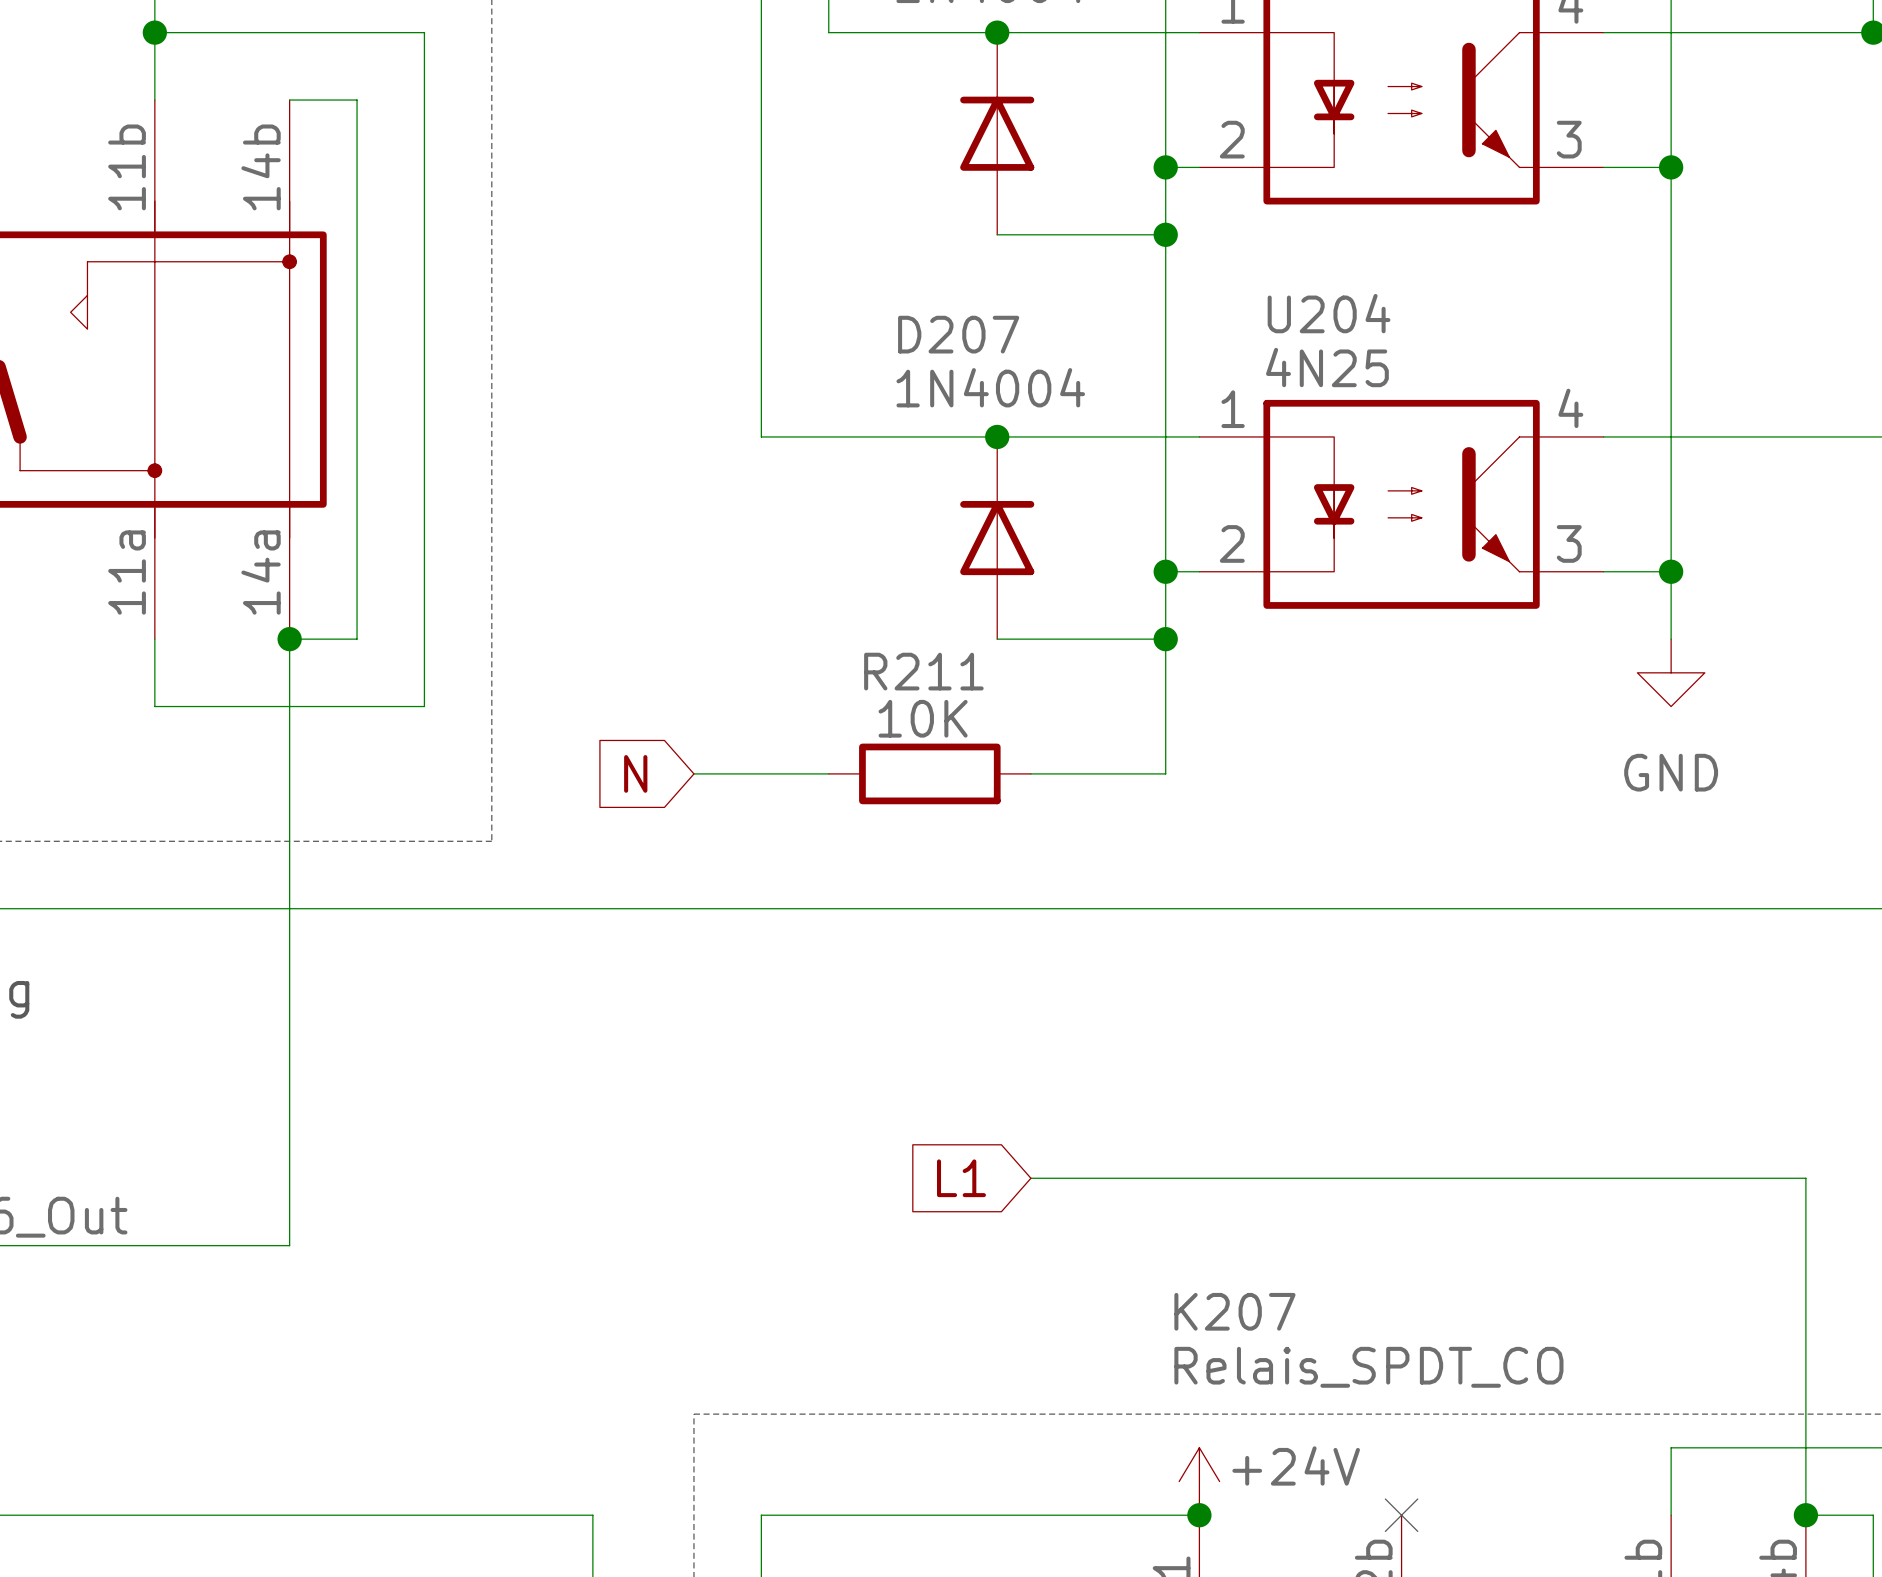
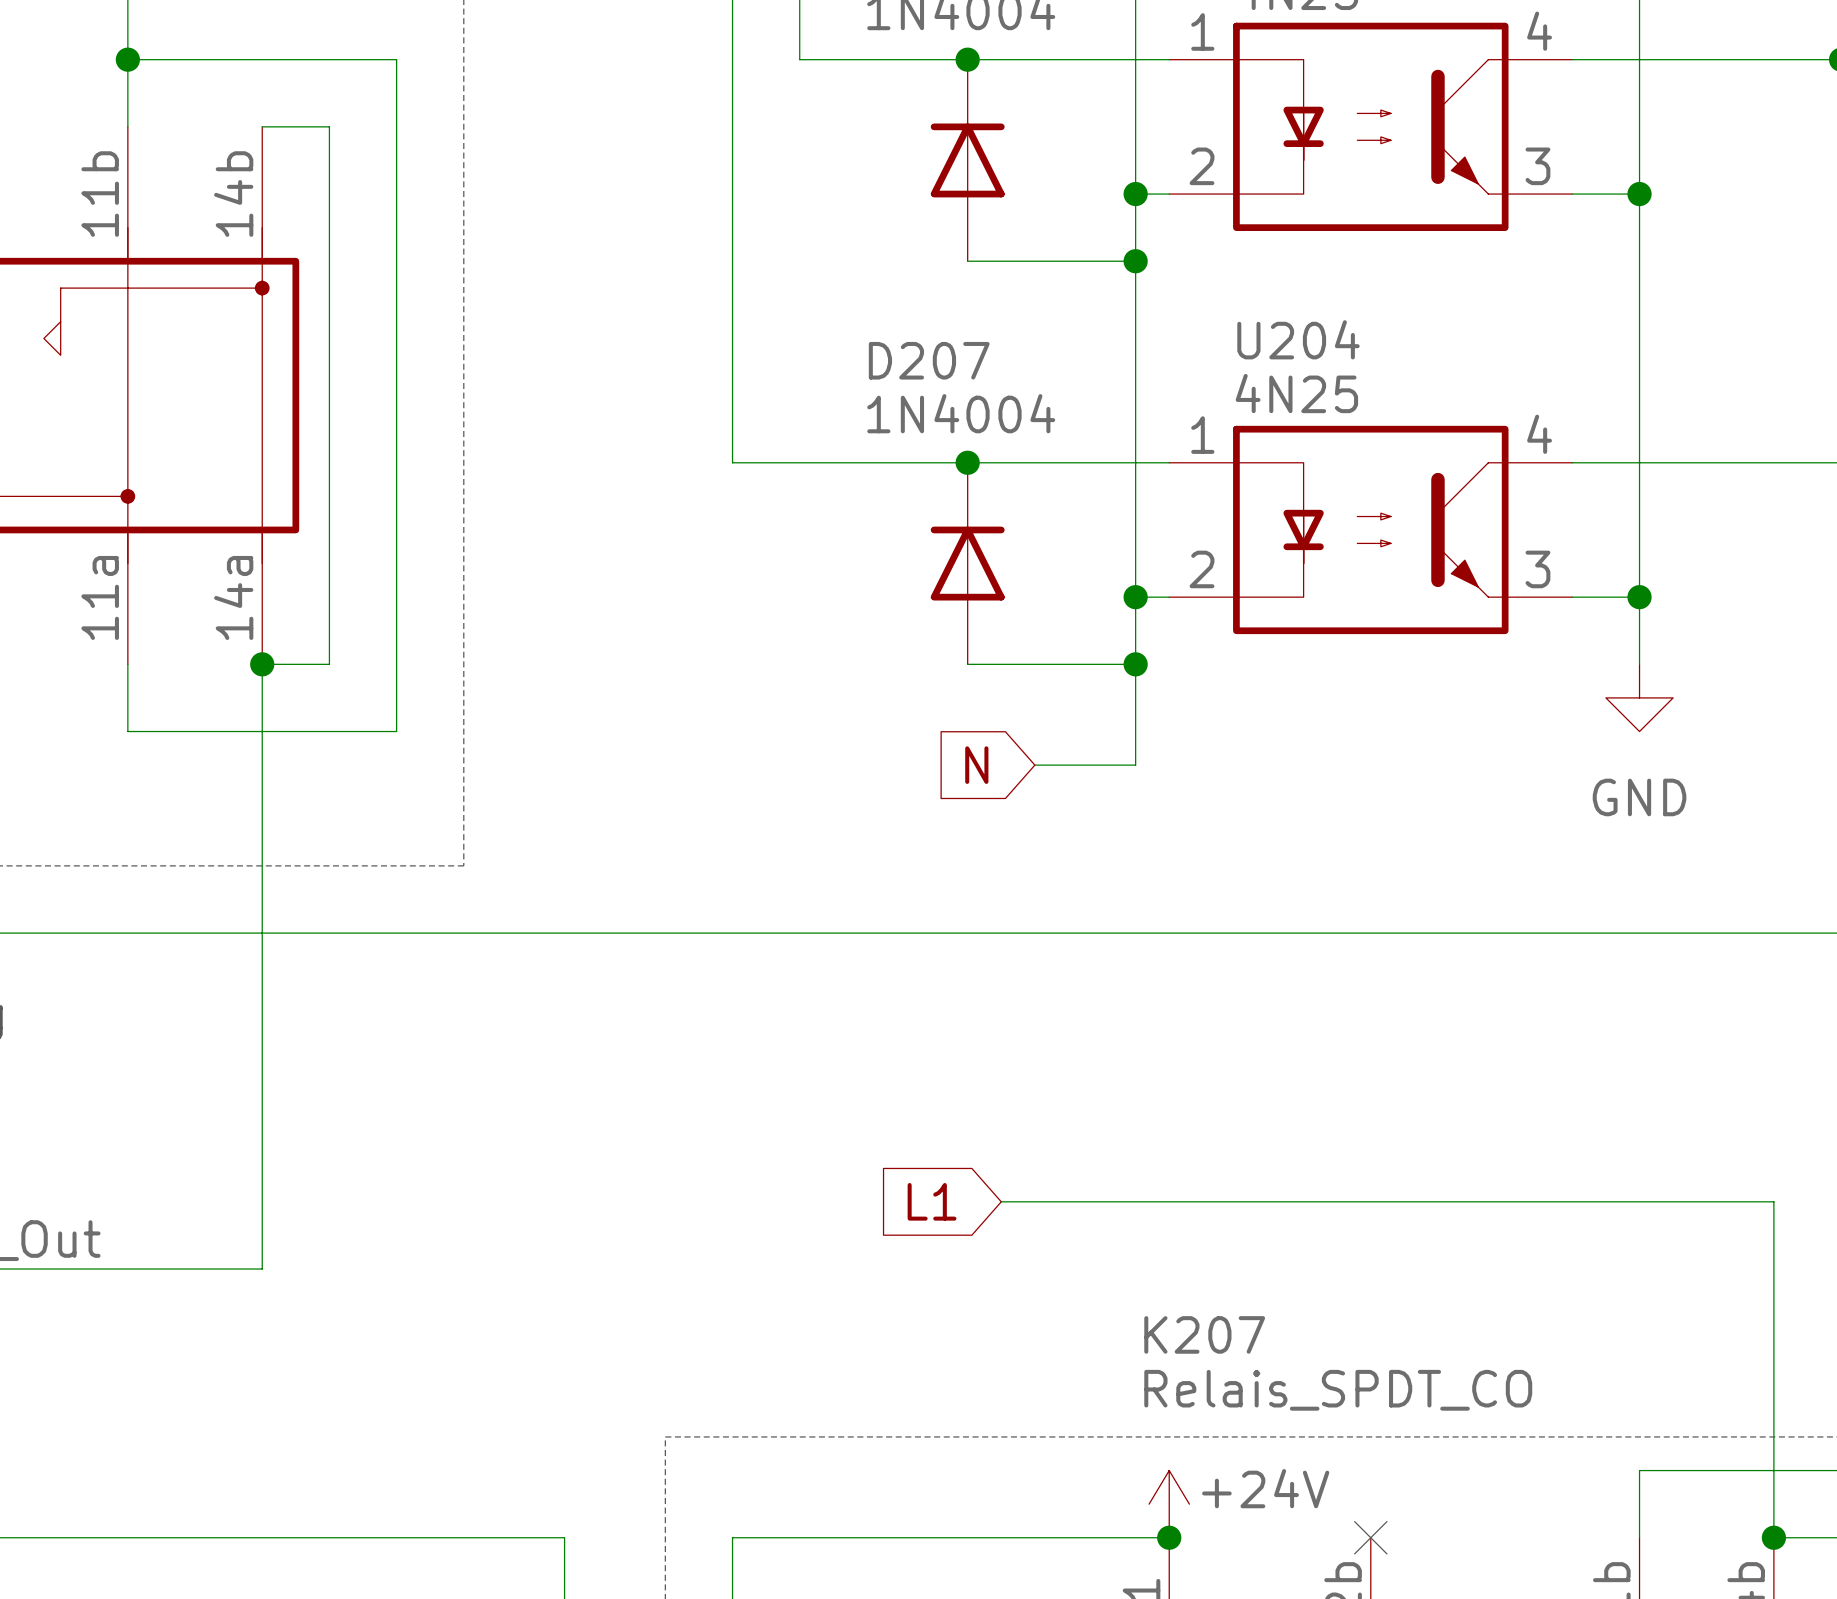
wire: (1165, 740) (1165, 773) (1030, 773) -> (1135, 765) (1034, 765)
global label position: N (635, 773) -> N (976, 765)
wire: (693, 773) (828, 773) -> none
R211: 10K (929, 773) -> none

